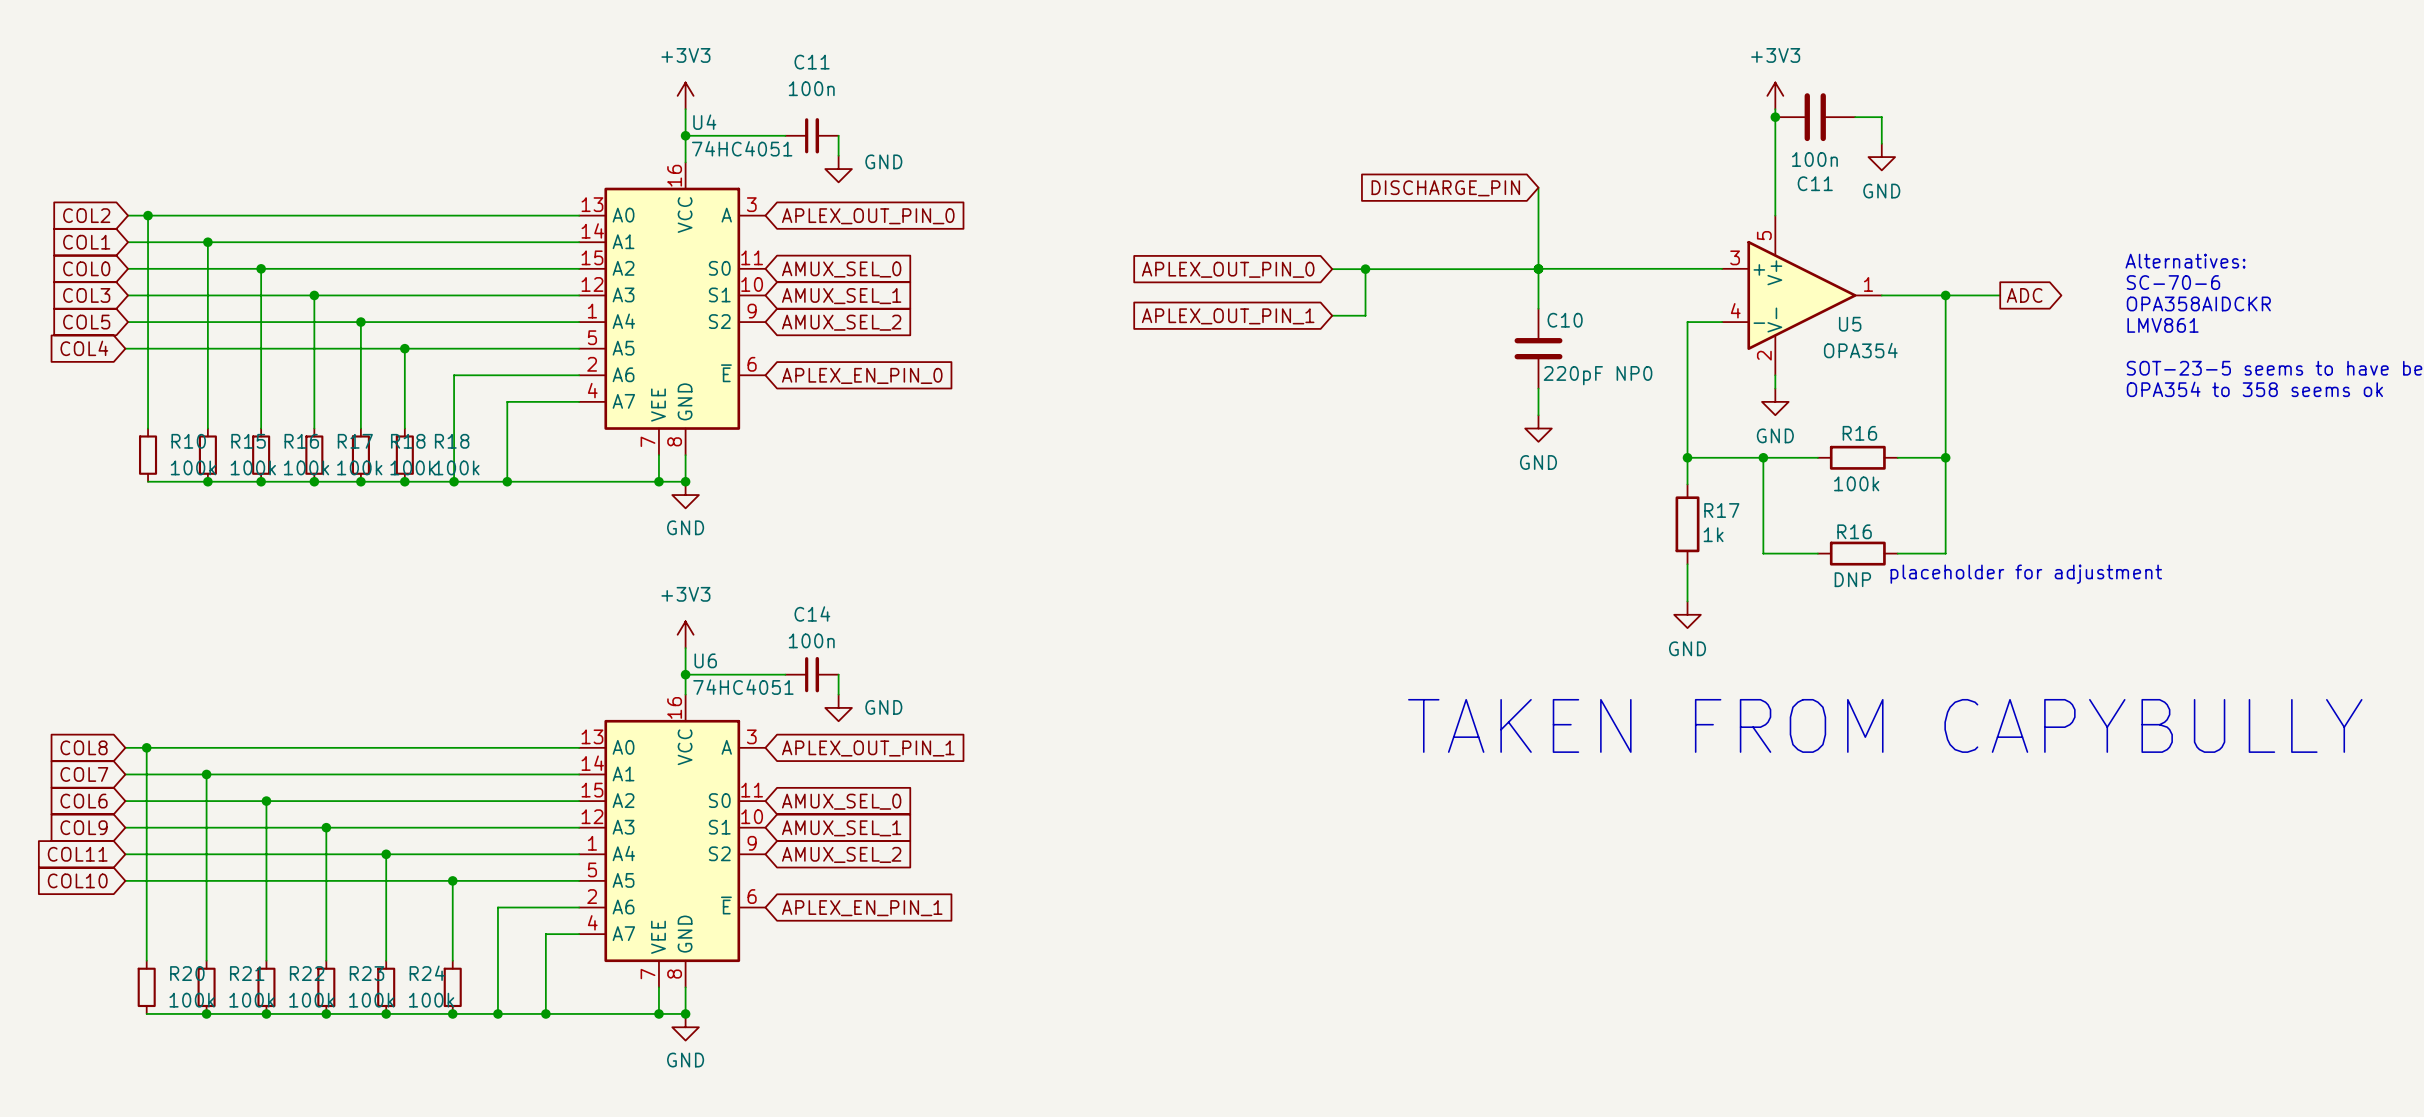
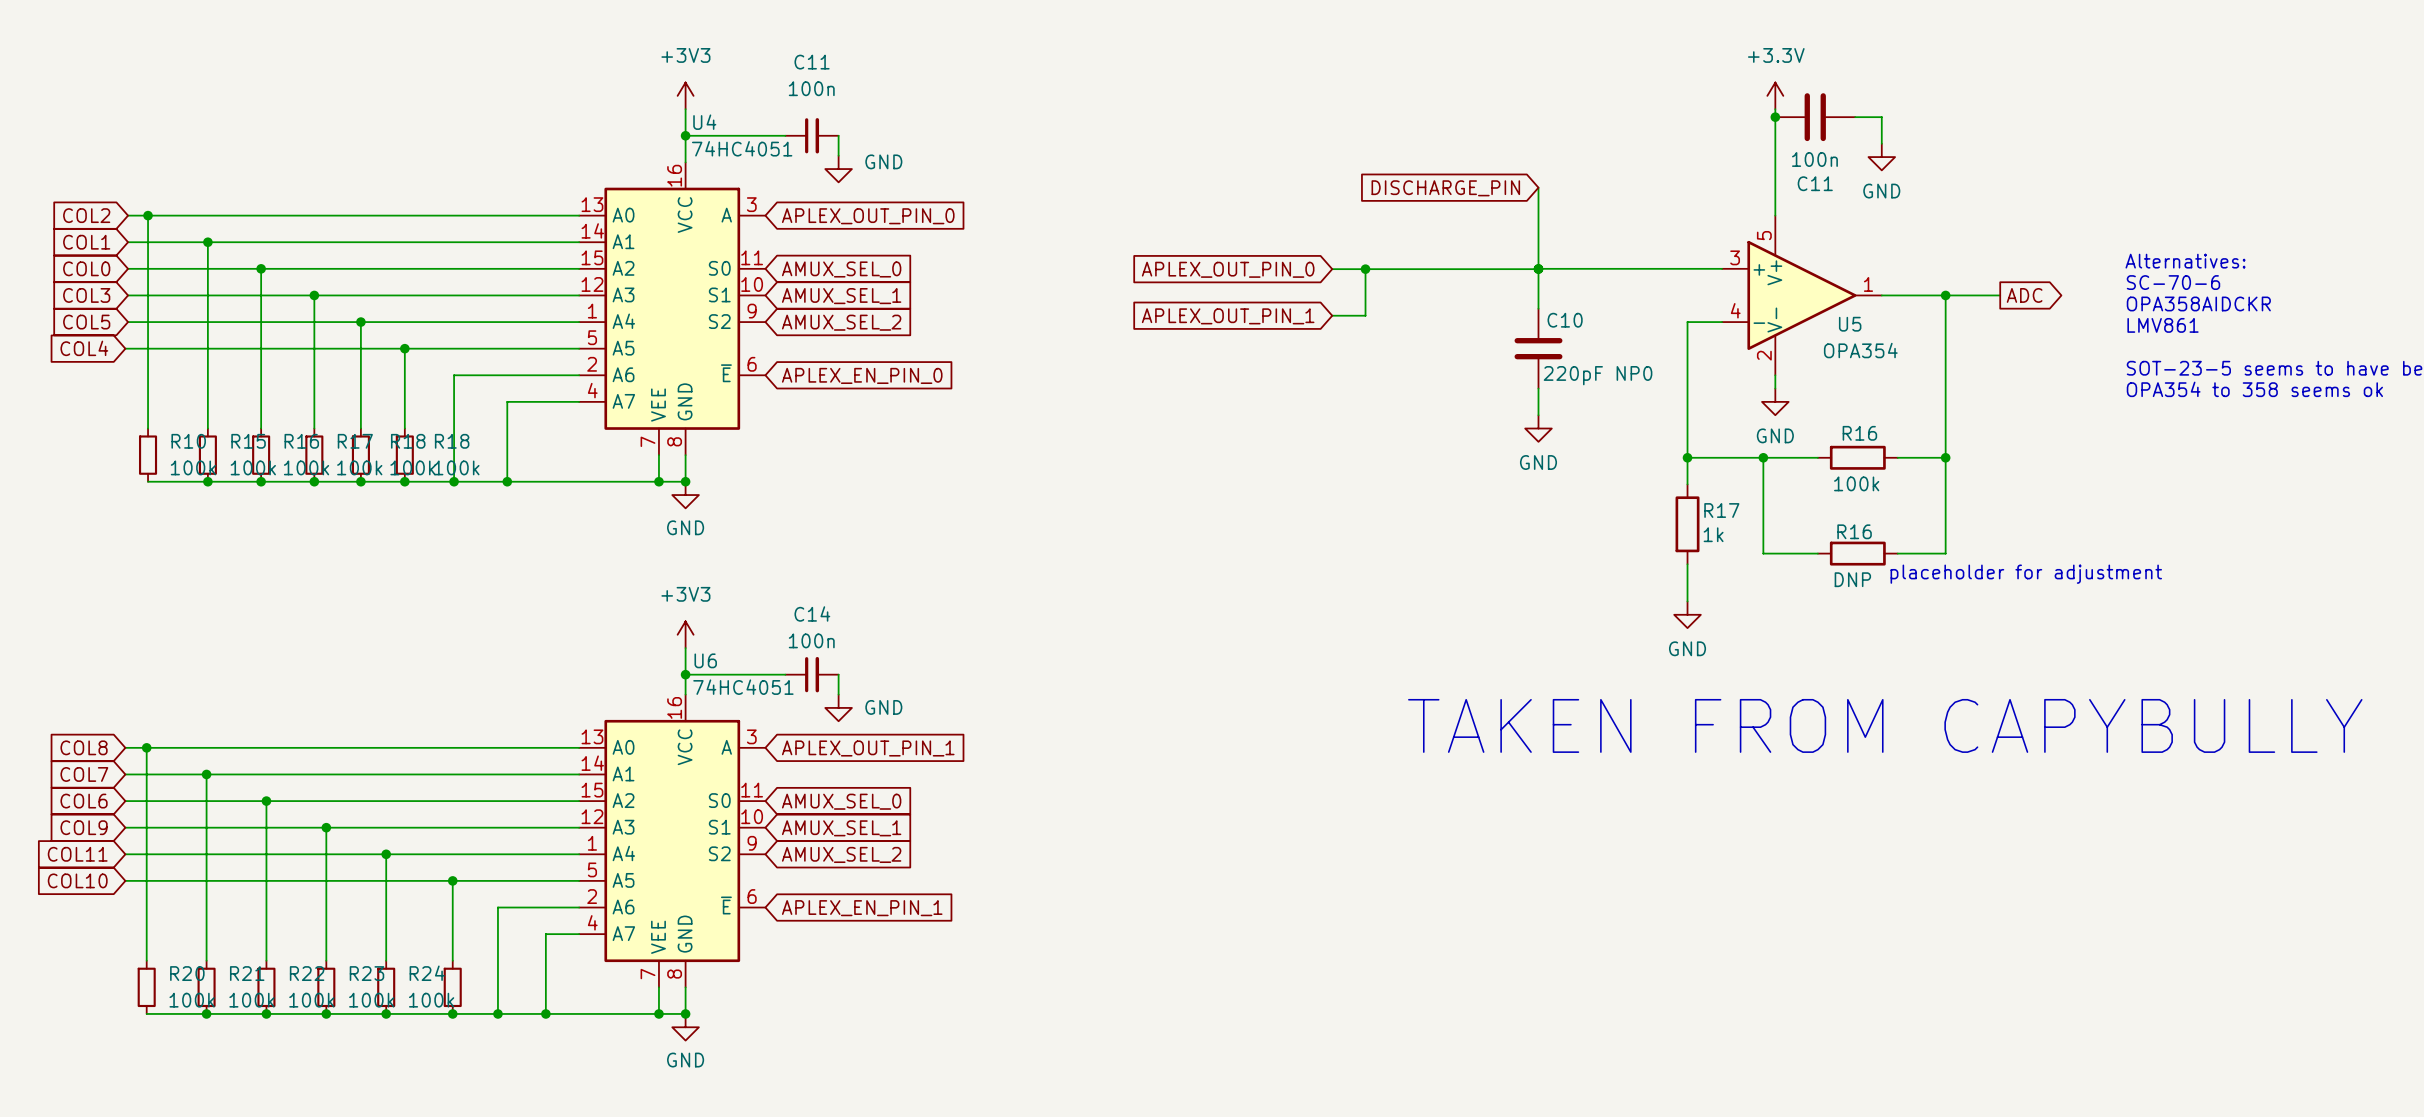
power symbol: +3V3 (1775, 95) -> +3.3V (1775, 95)

